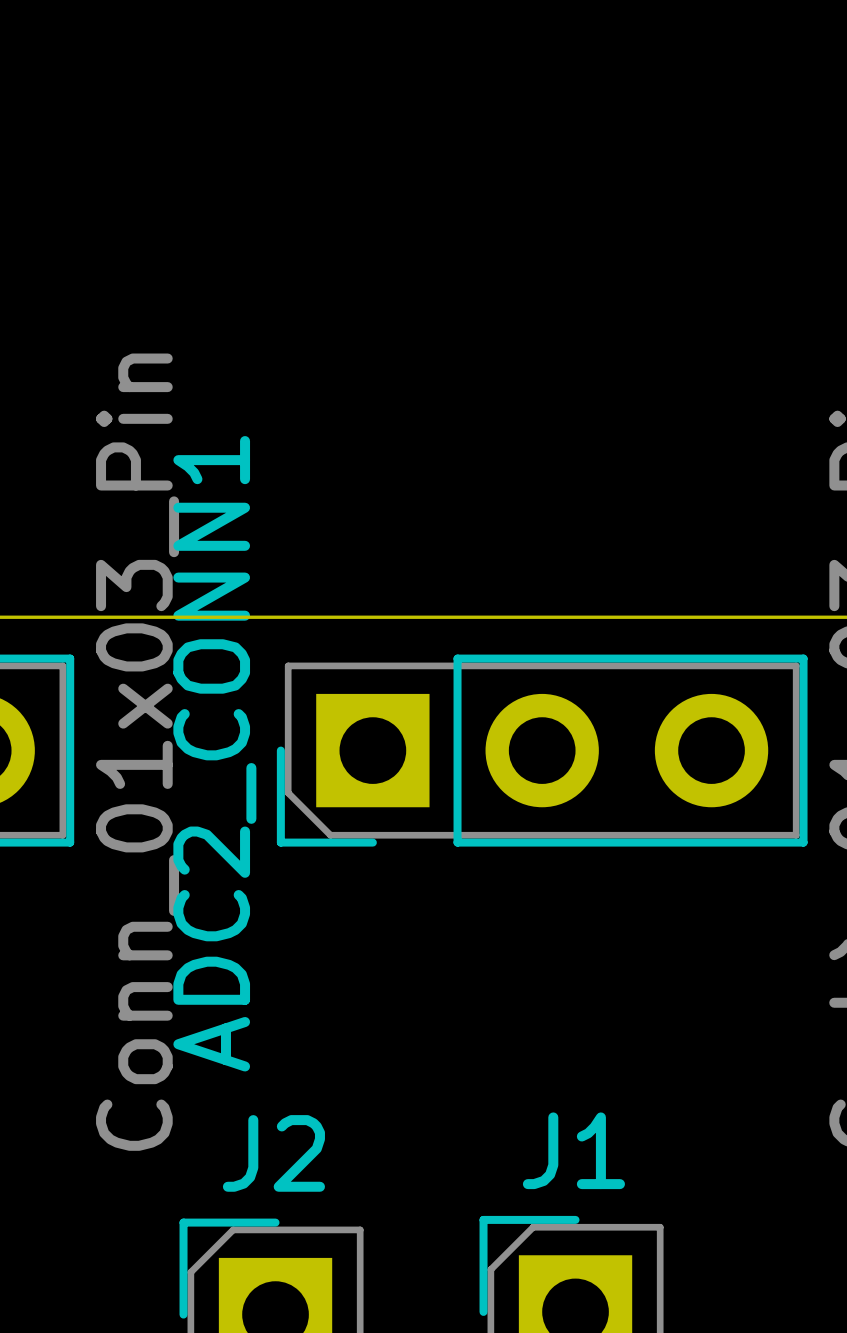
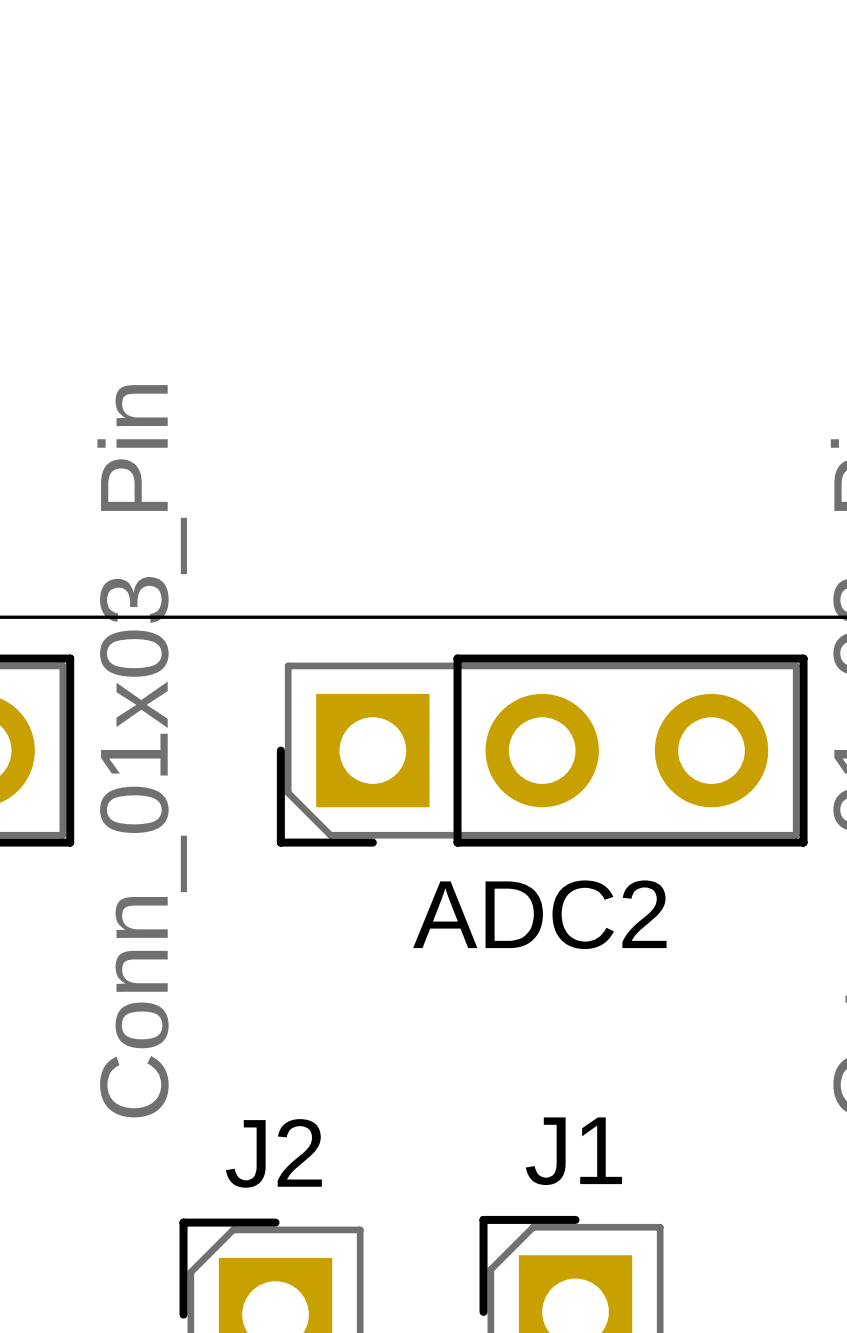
ADC2_CONN1 name: ADC2_CONN1 (214, 753) -> ADC2 (539, 914)

